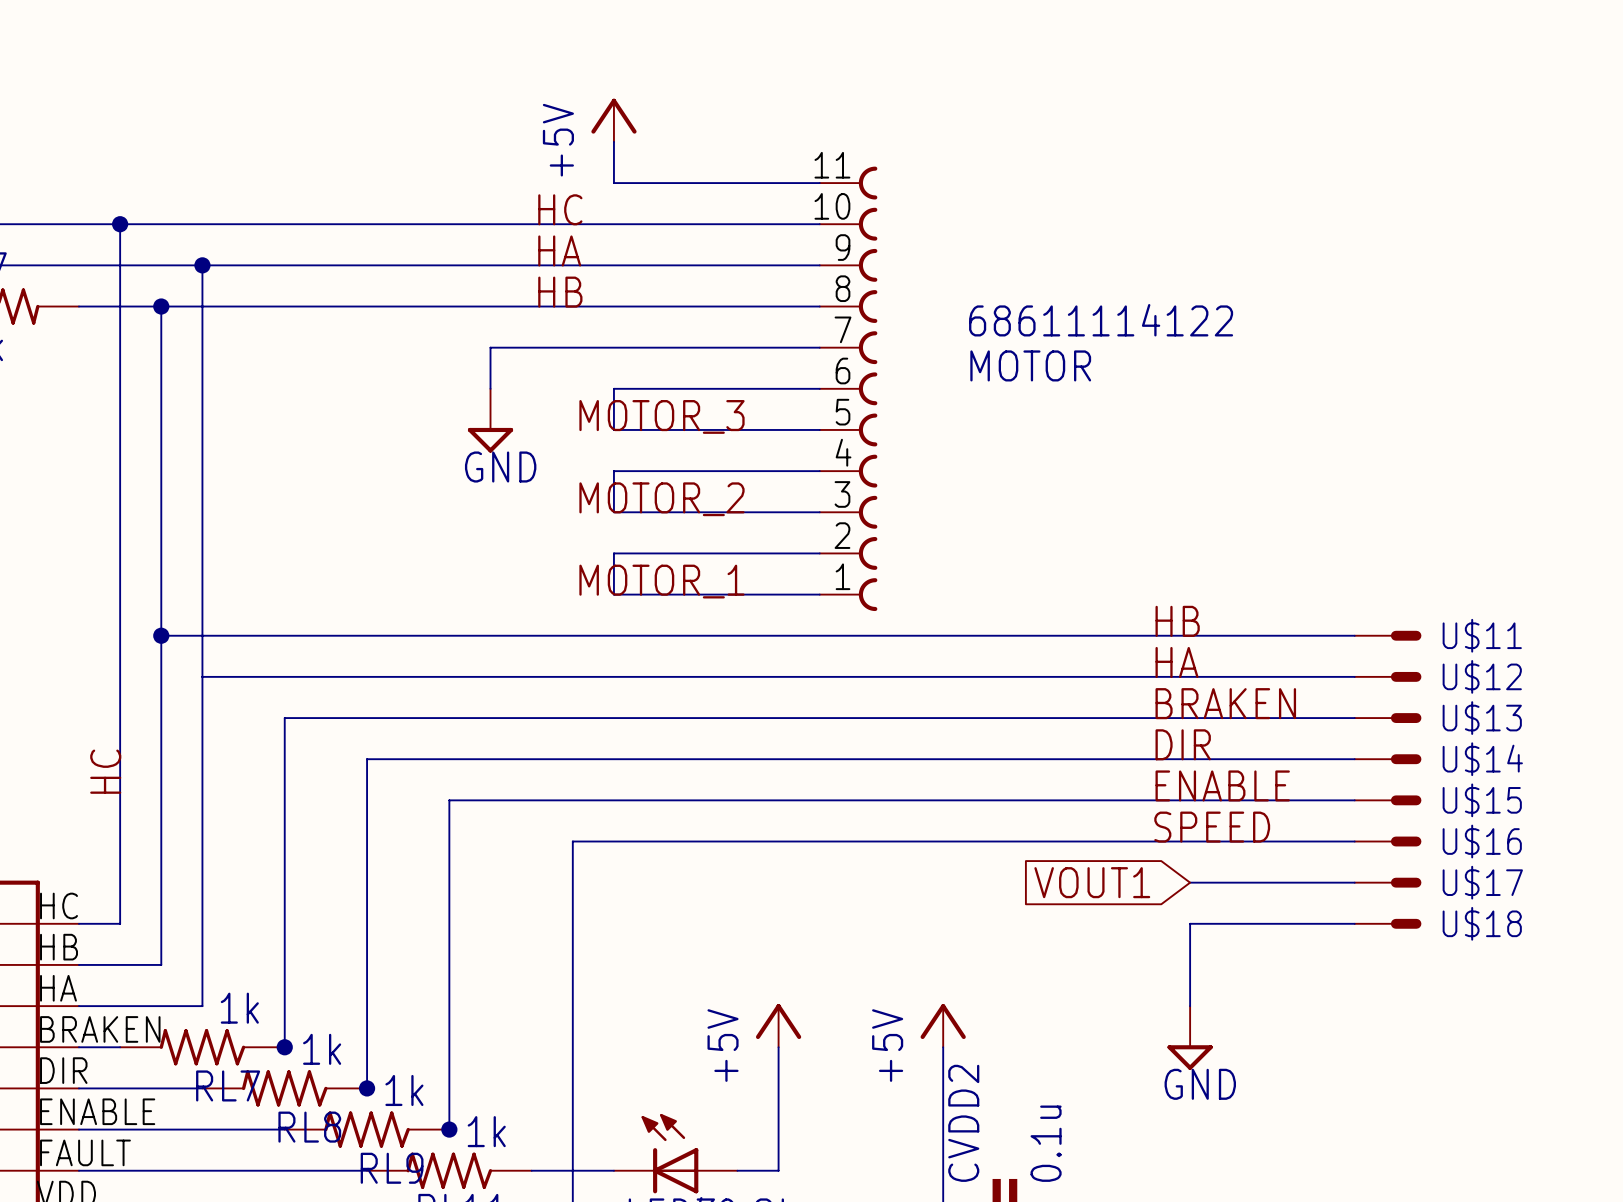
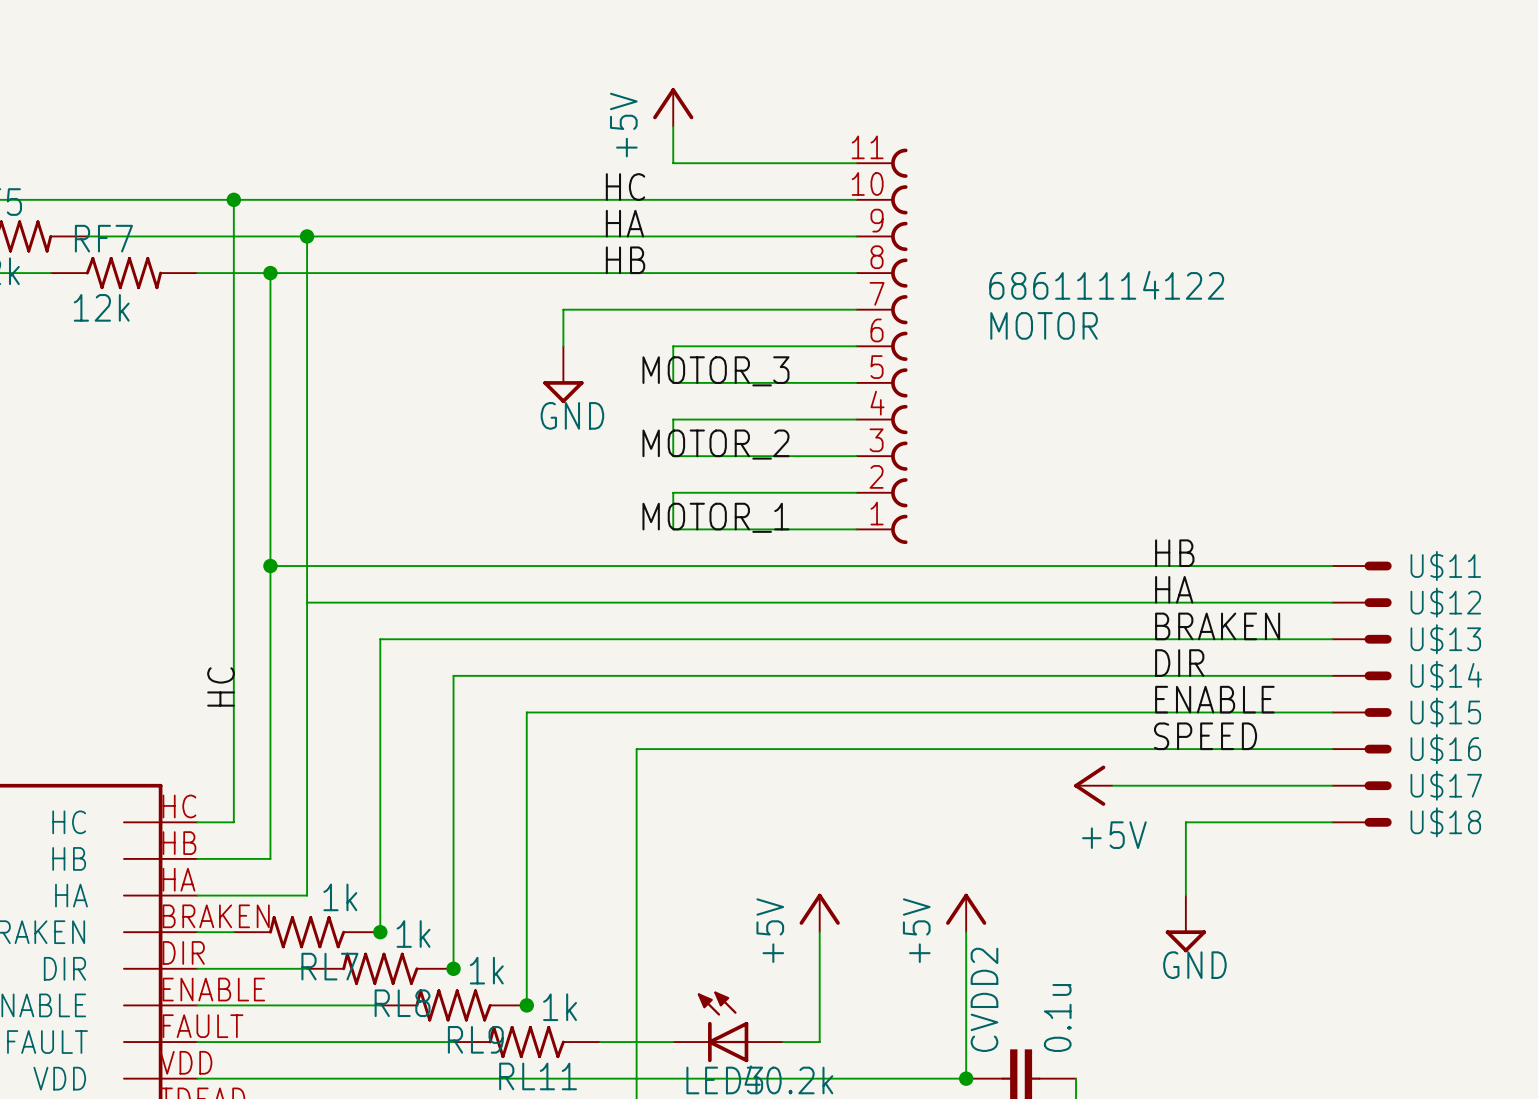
power symbol: none -> +5V (1093, 785)
global label: VOUT1 (1092, 882) -> none
wire: none -> (1112, 785) (1185, 785)

